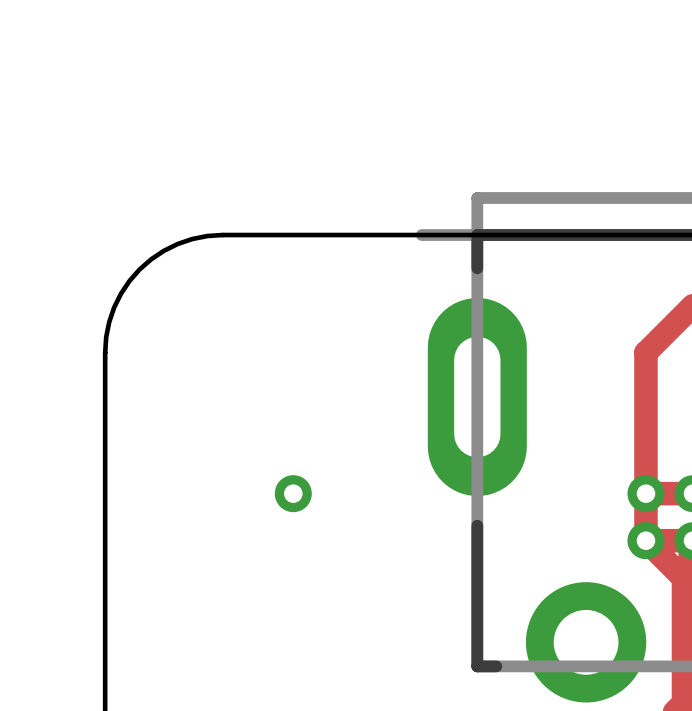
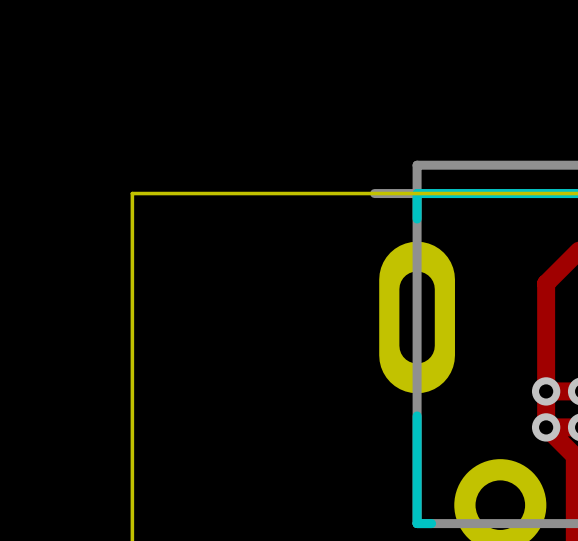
board edge: (222, 235) (207, 236) (177, 243) (163, 250) (139, 269) (120, 293) (114, 307) (106, 337) (105, 352) -> (222, 193) (132, 193) (132, 283)
via: (293, 493) -> none

